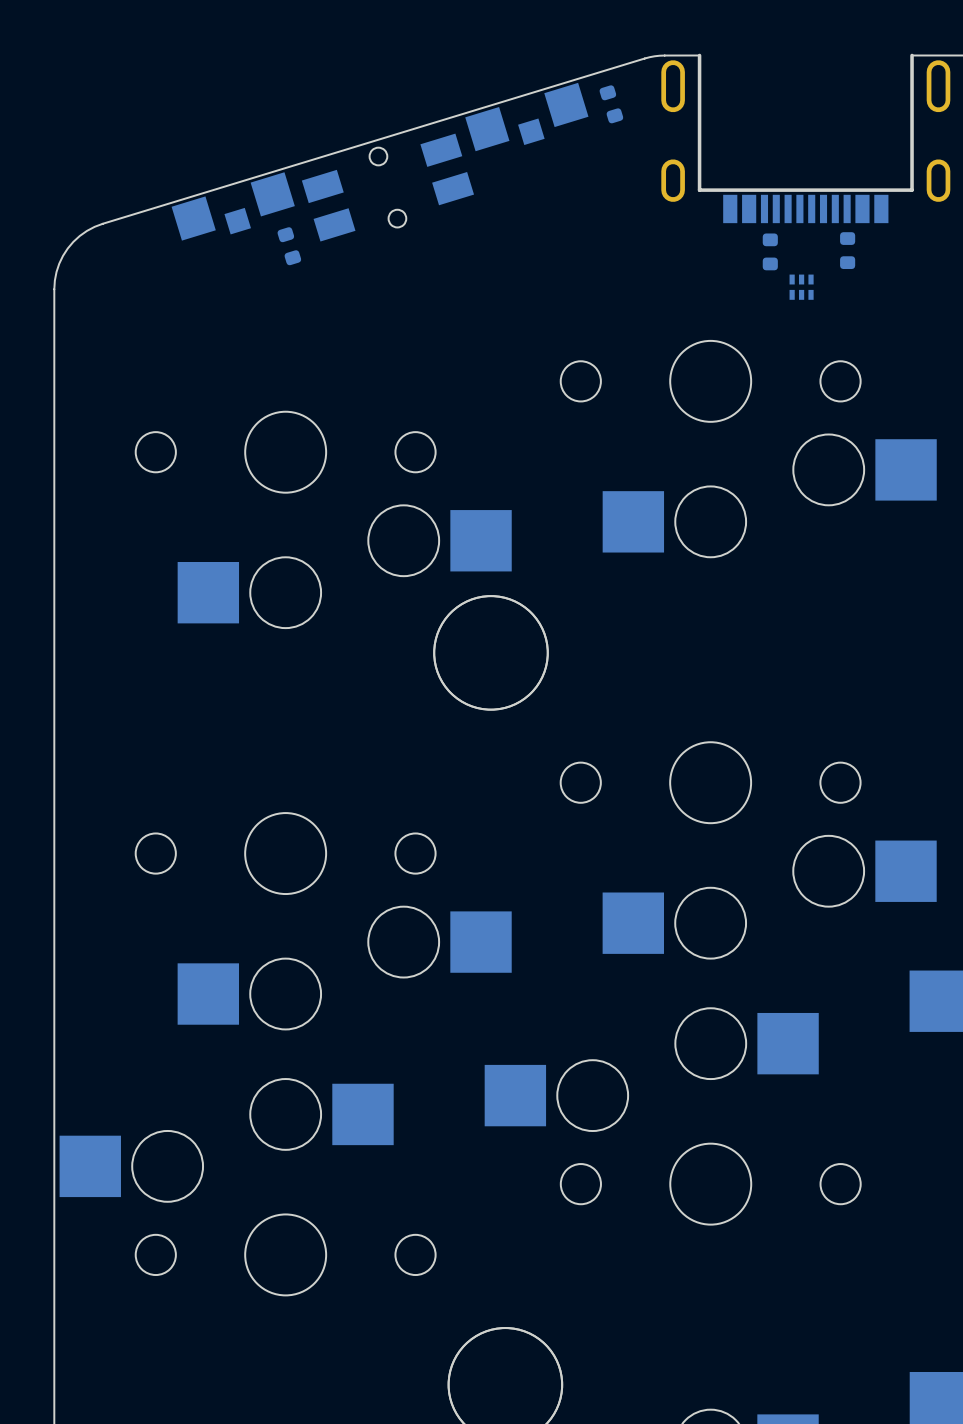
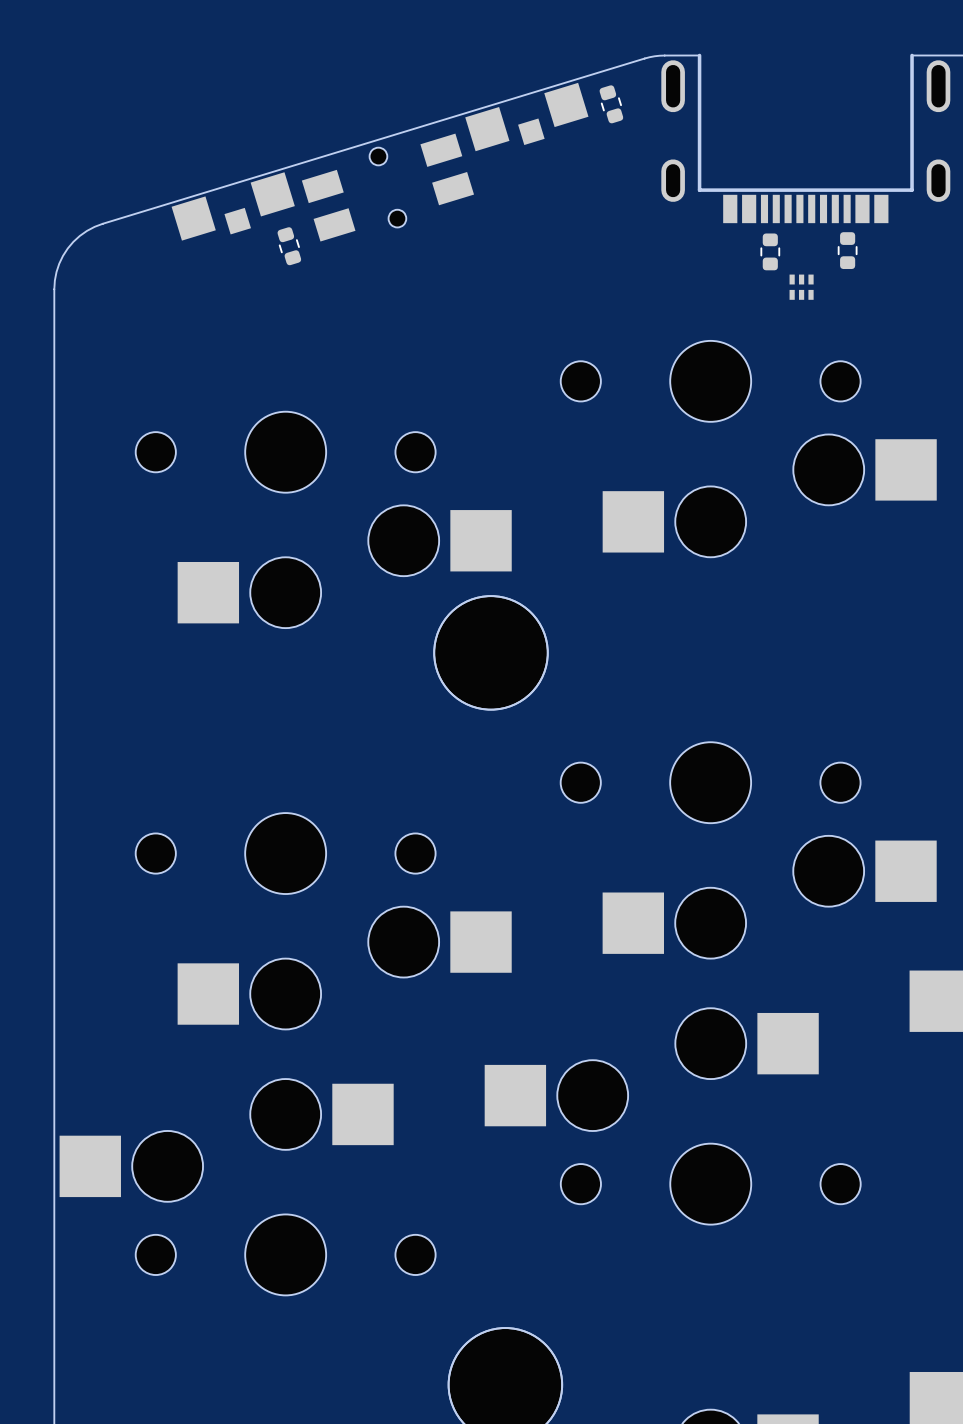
part footprint: [599, 85, 624, 124] -> [599, 85, 624, 124]
part footprint: [277, 227, 302, 266] -> [277, 227, 302, 266]
part footprint: [840, 232, 856, 270] -> [838, 232, 857, 270]
part footprint: [762, 233, 778, 271] -> [761, 233, 780, 271]

